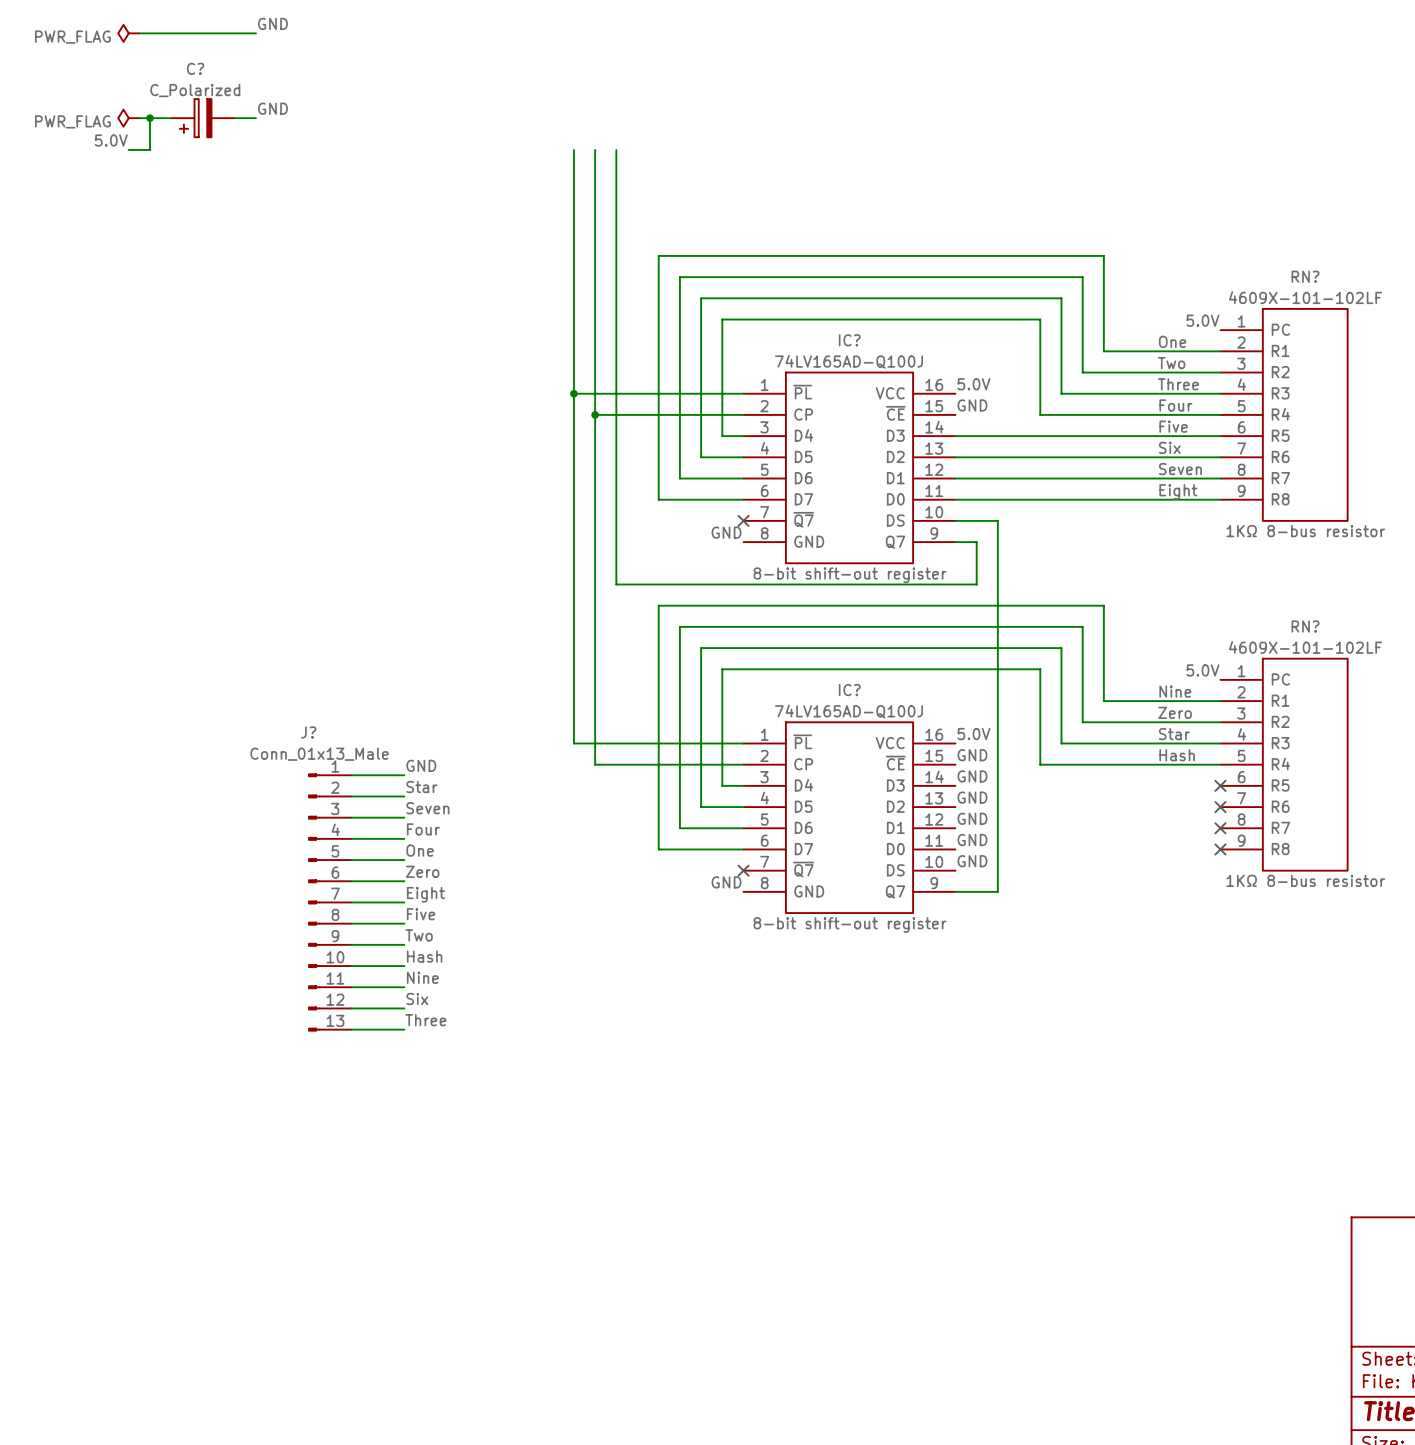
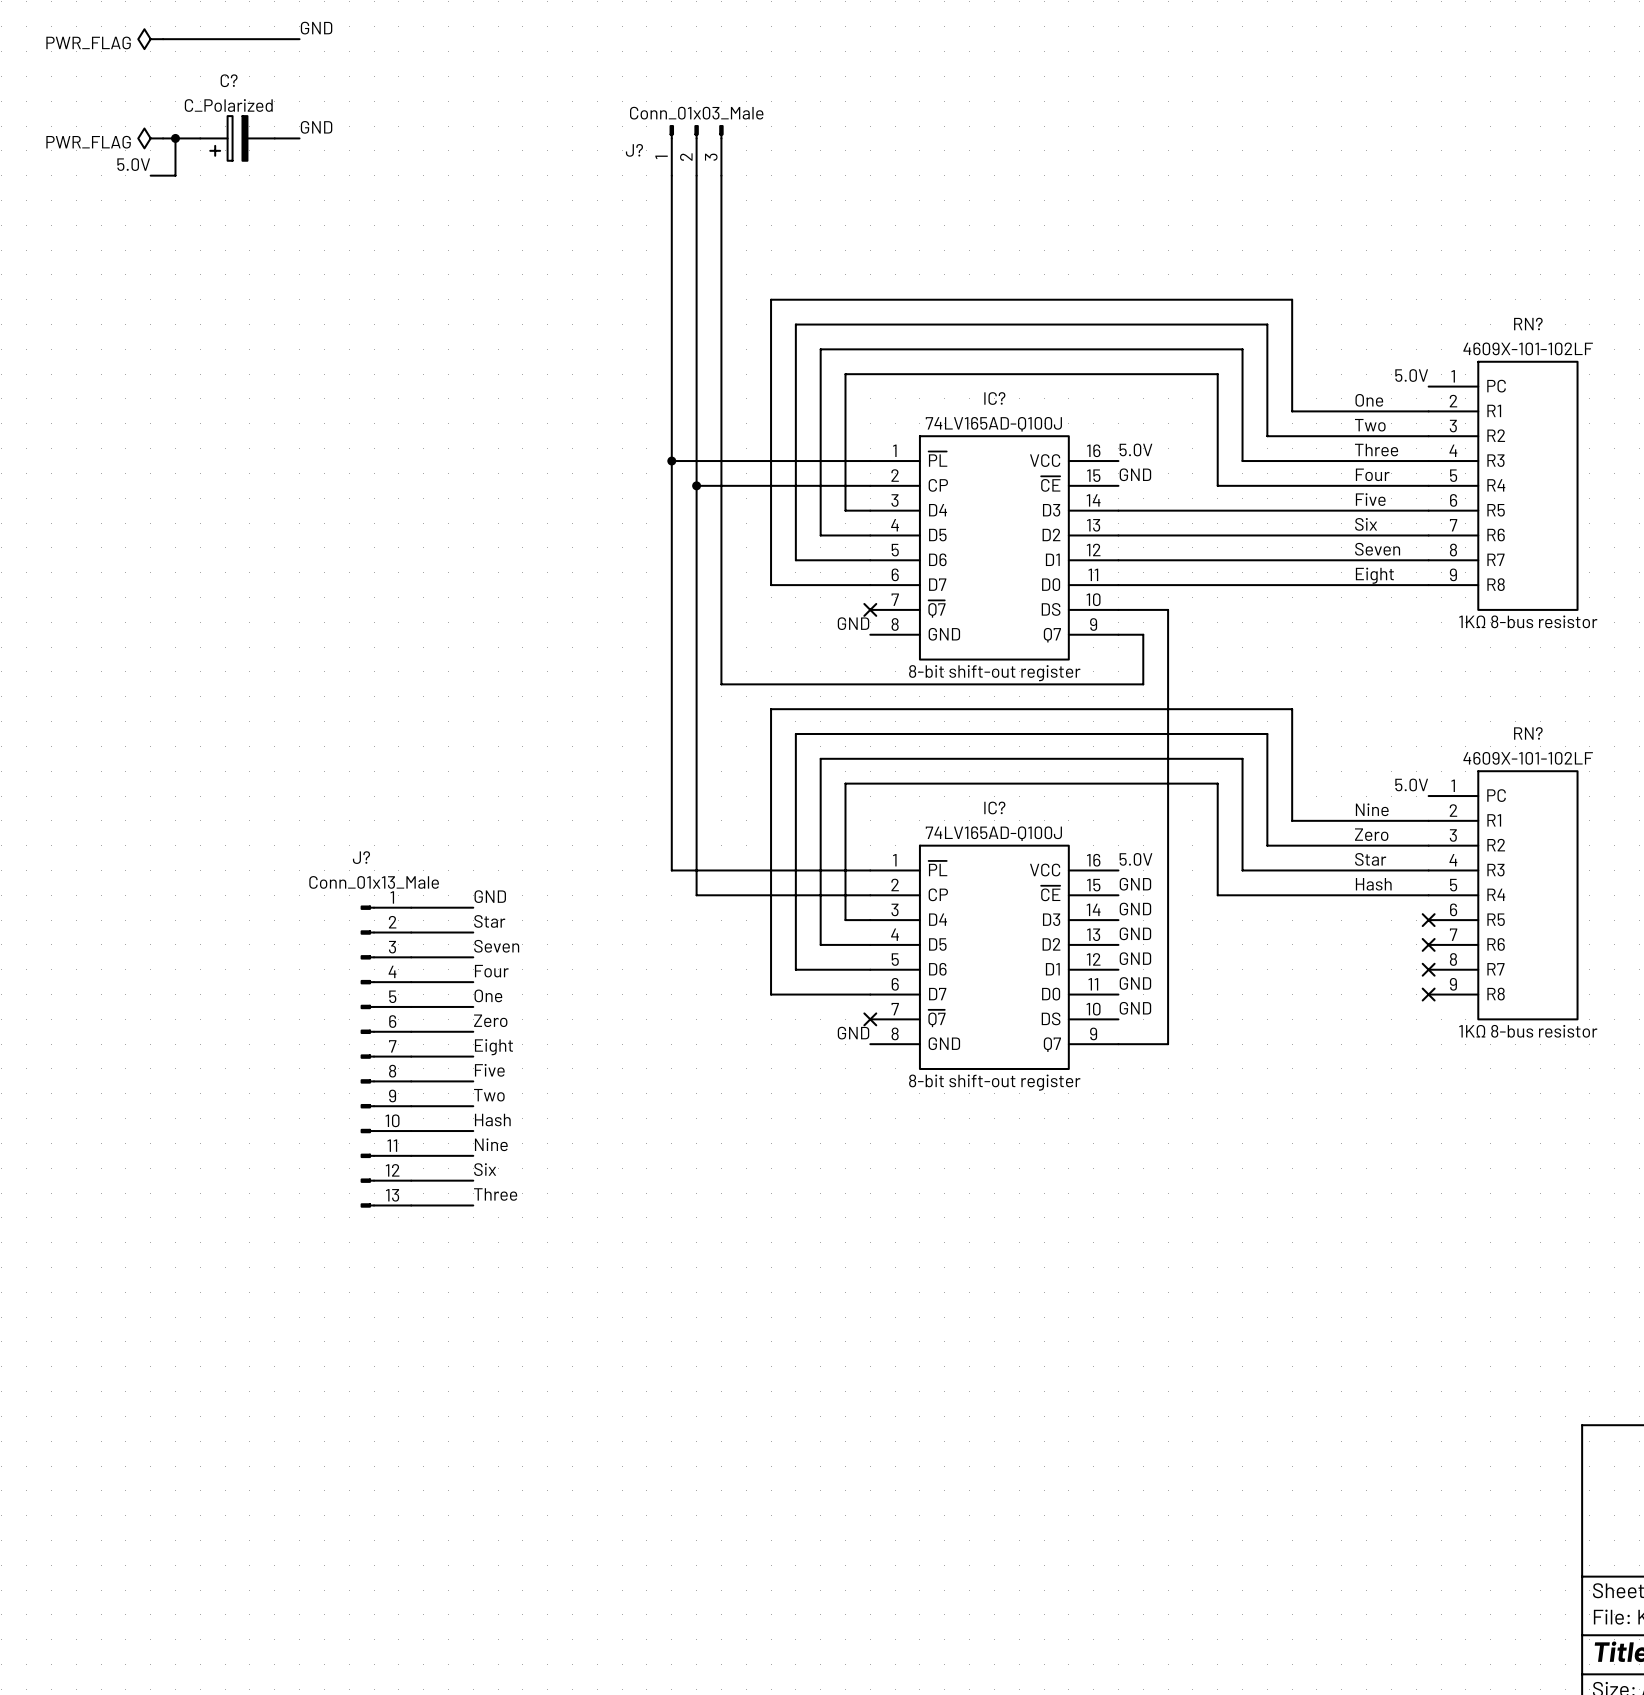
J?: none -> Conn_01x03_Male (696, 150)

